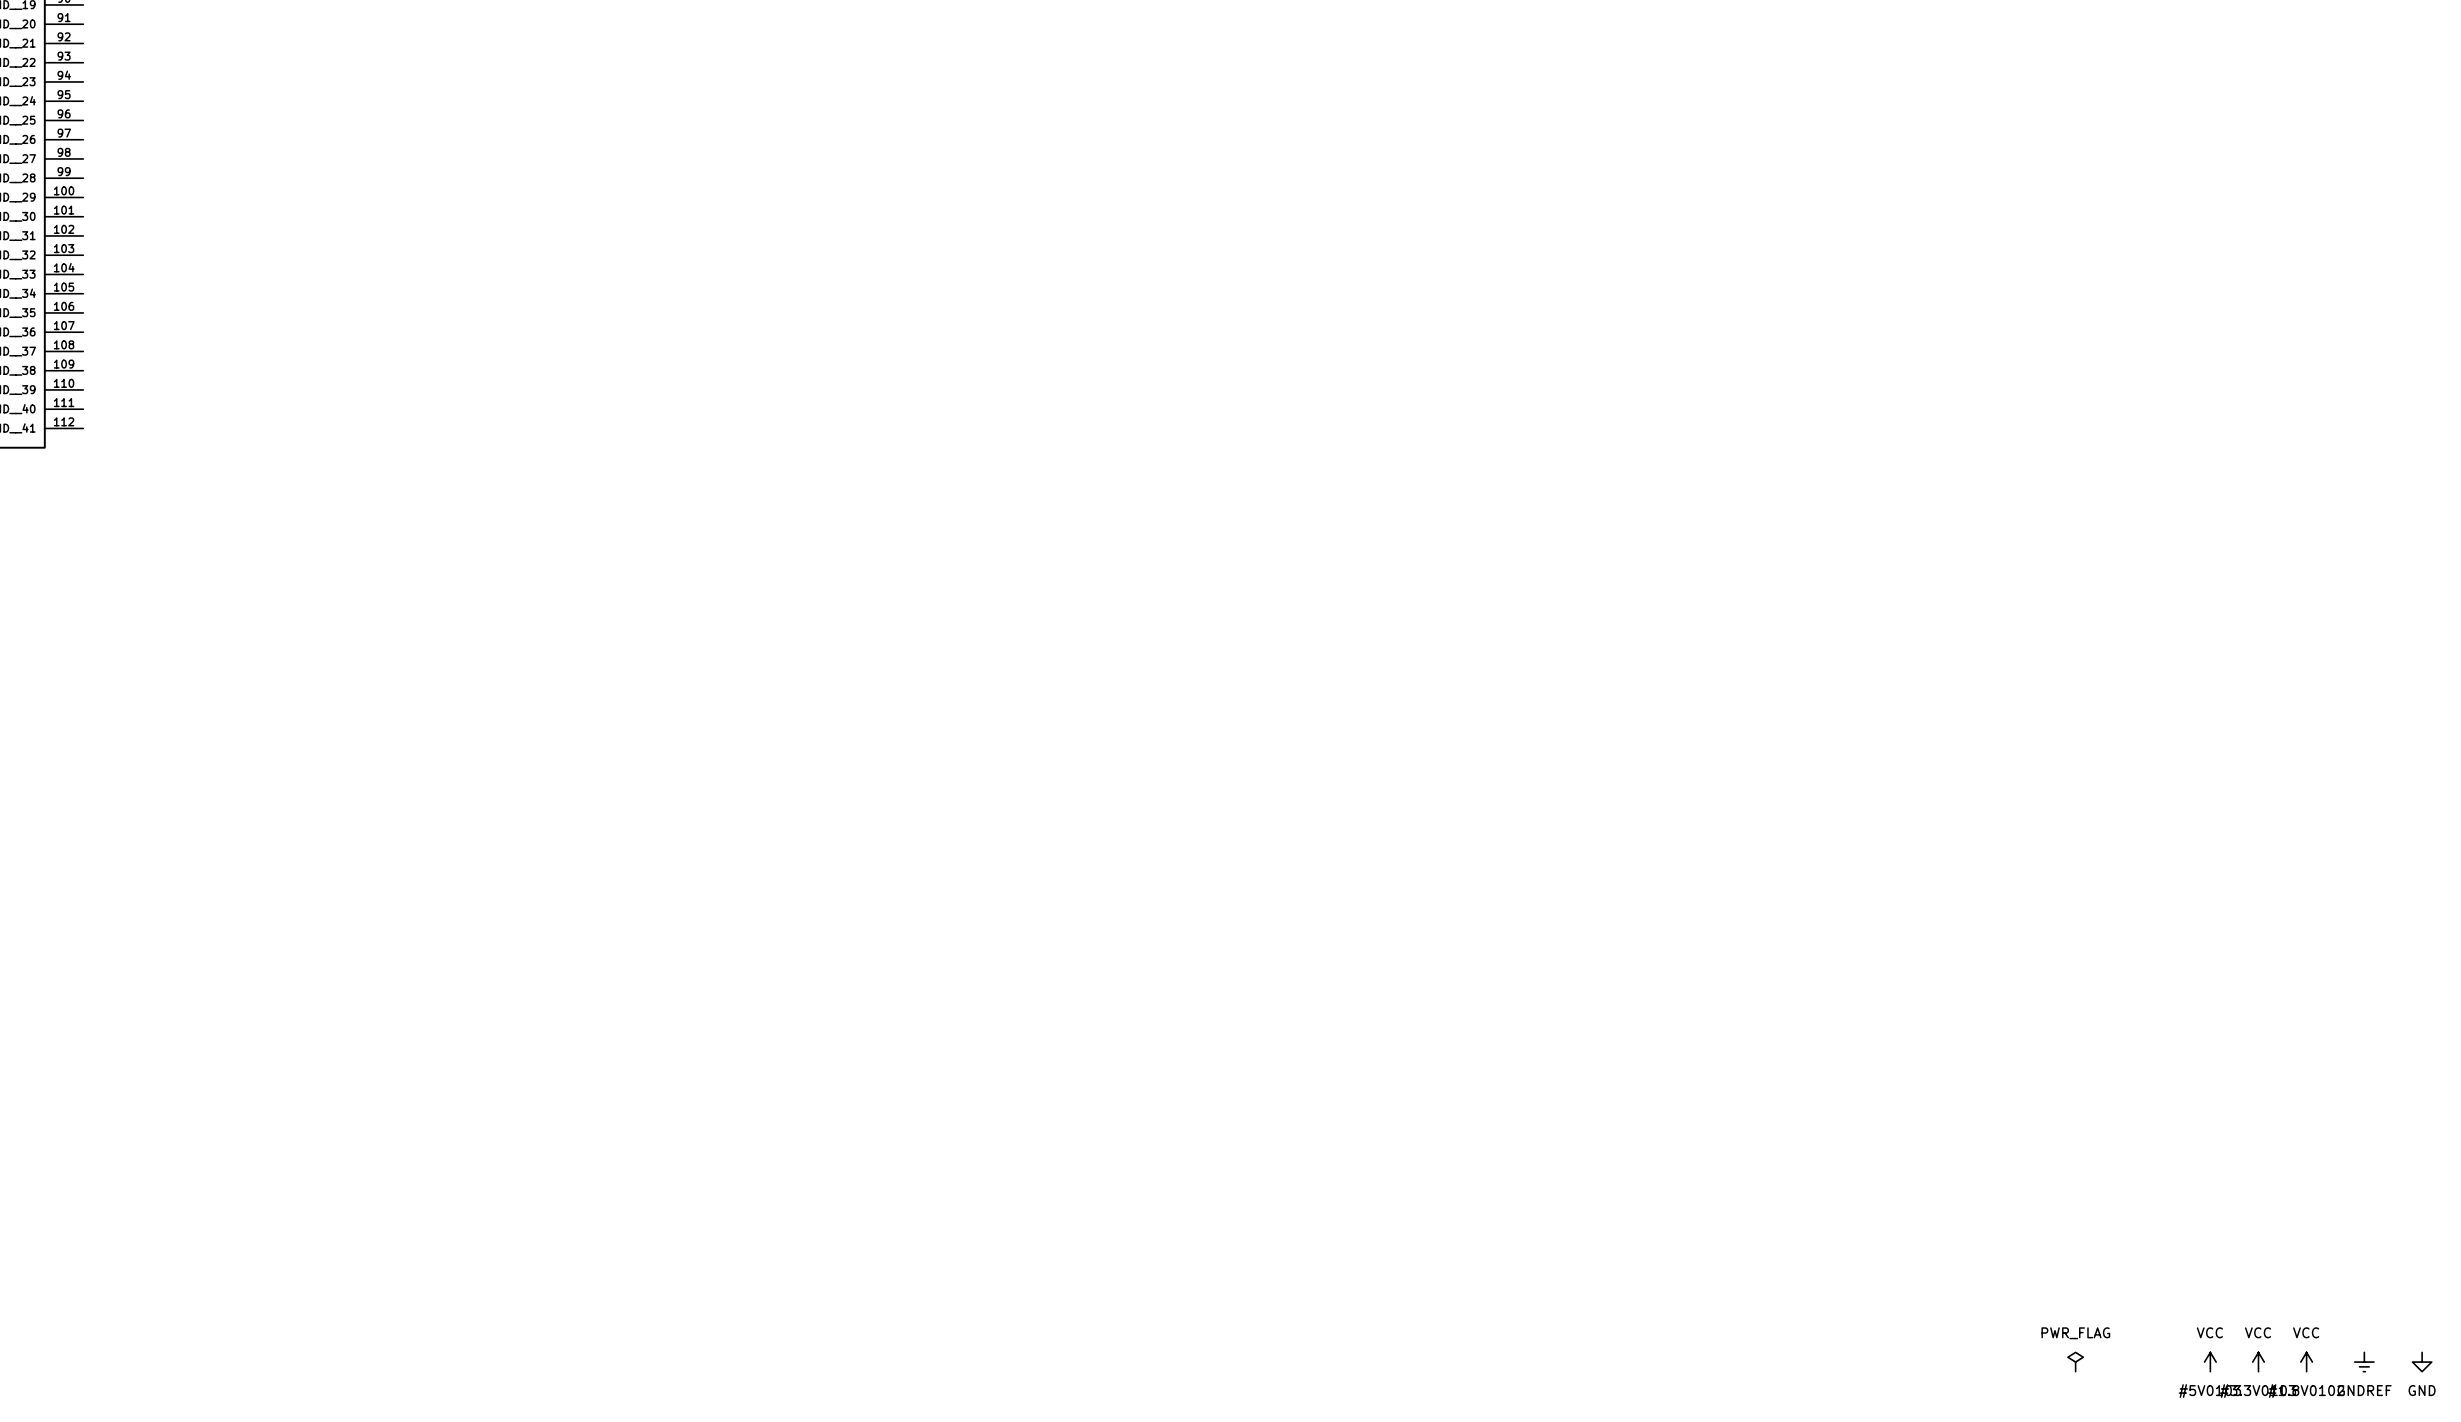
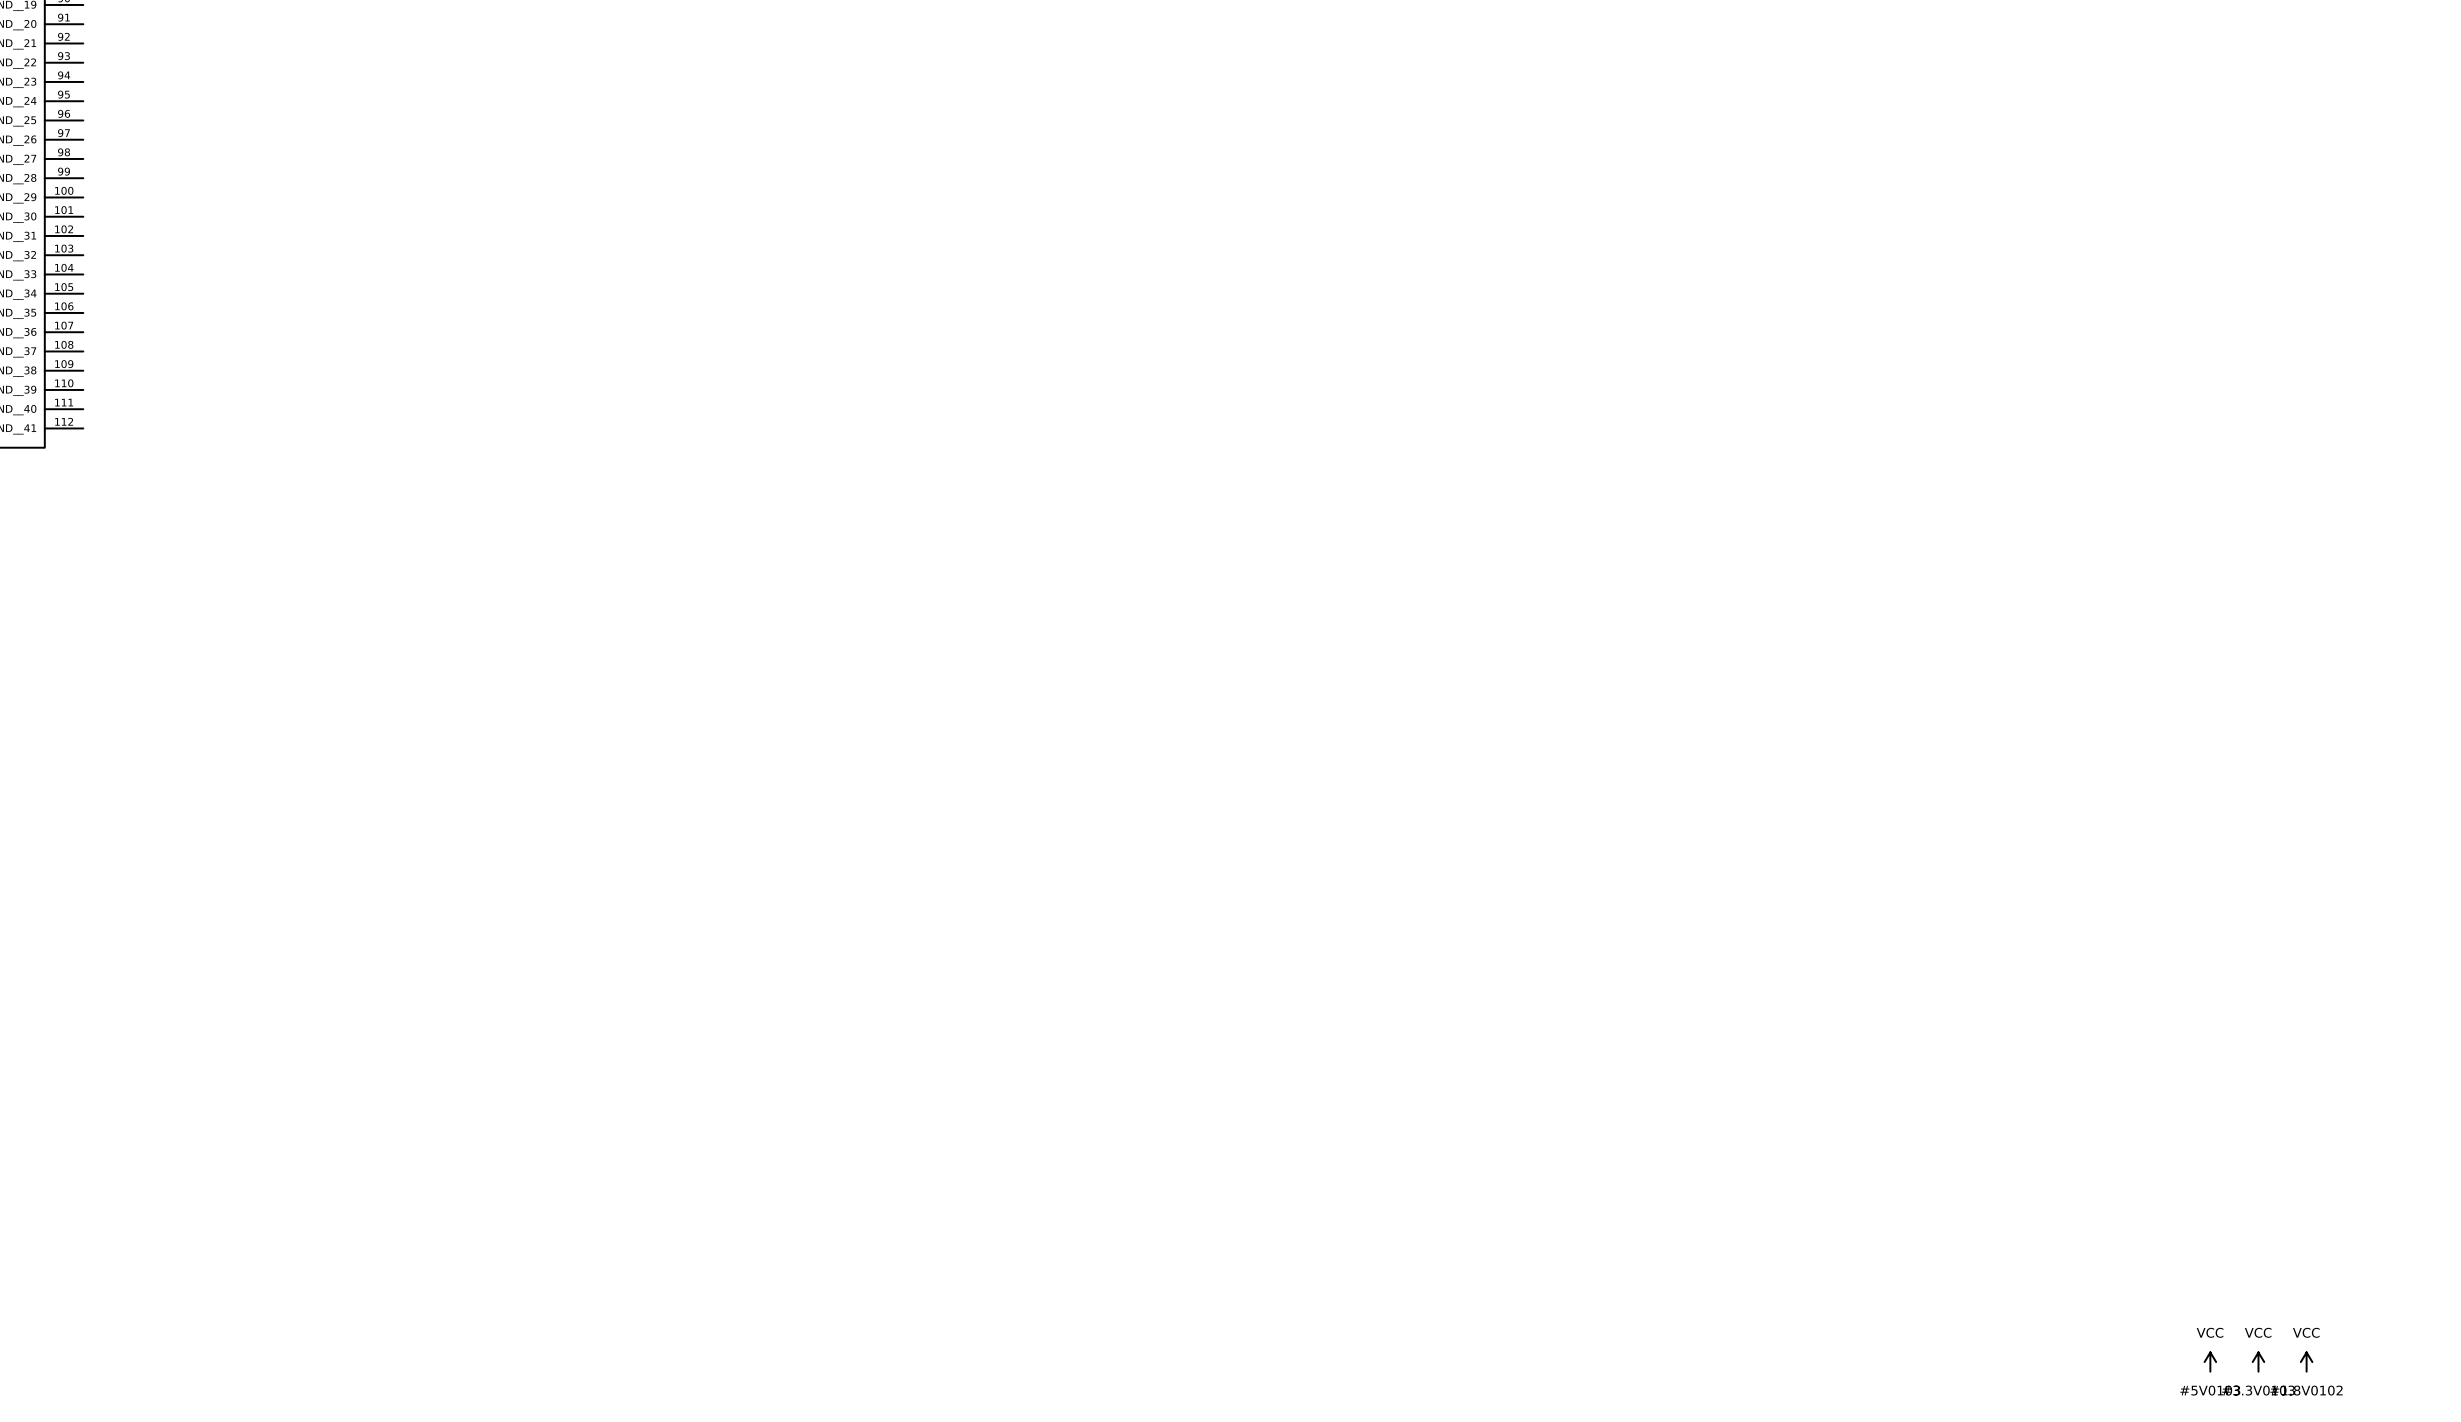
power symbol: PWR_FLAG (2075, 1362) -> none
power symbol: GNDREF (2364, 1362) -> none
power symbol: GND (2422, 1362) -> none

